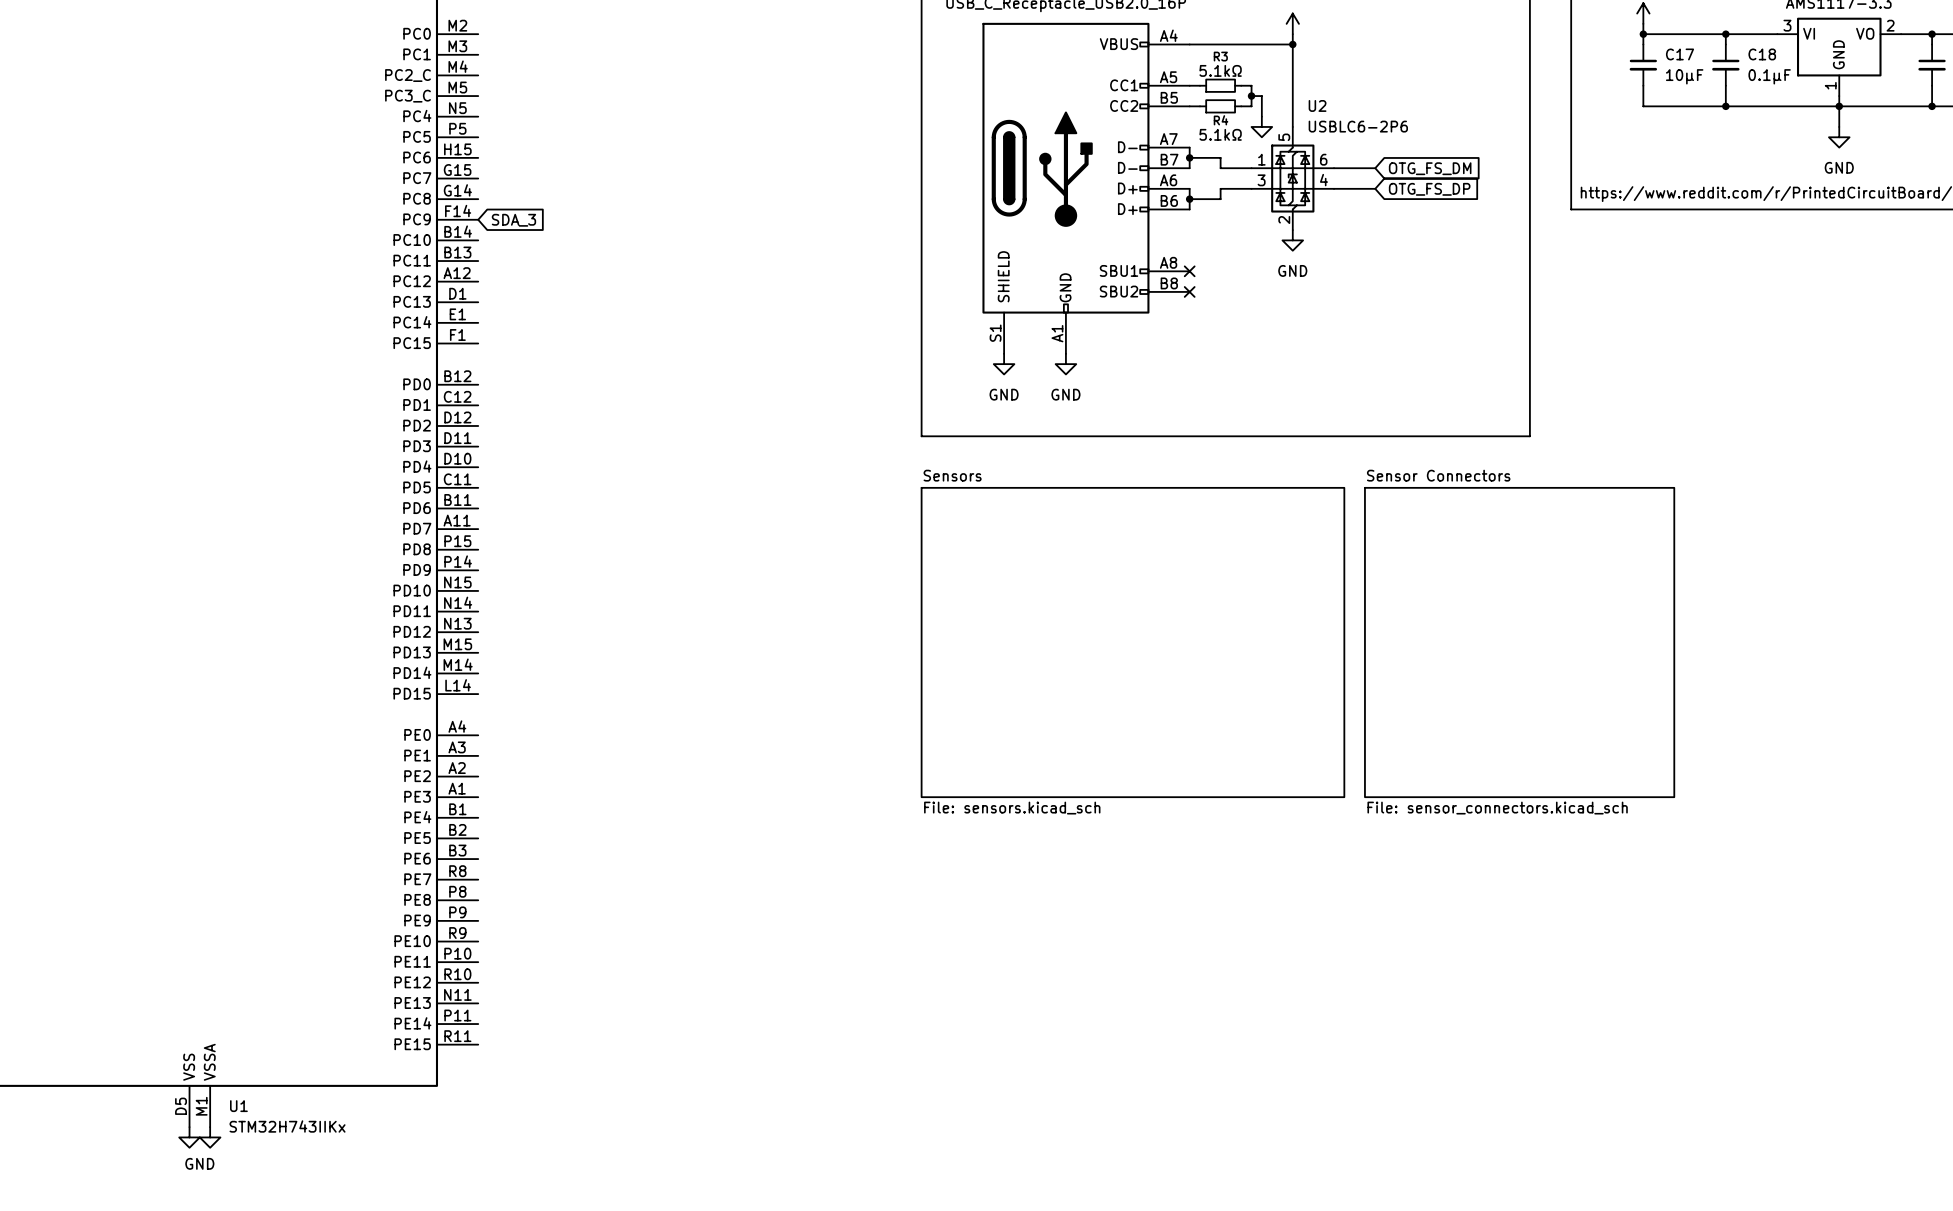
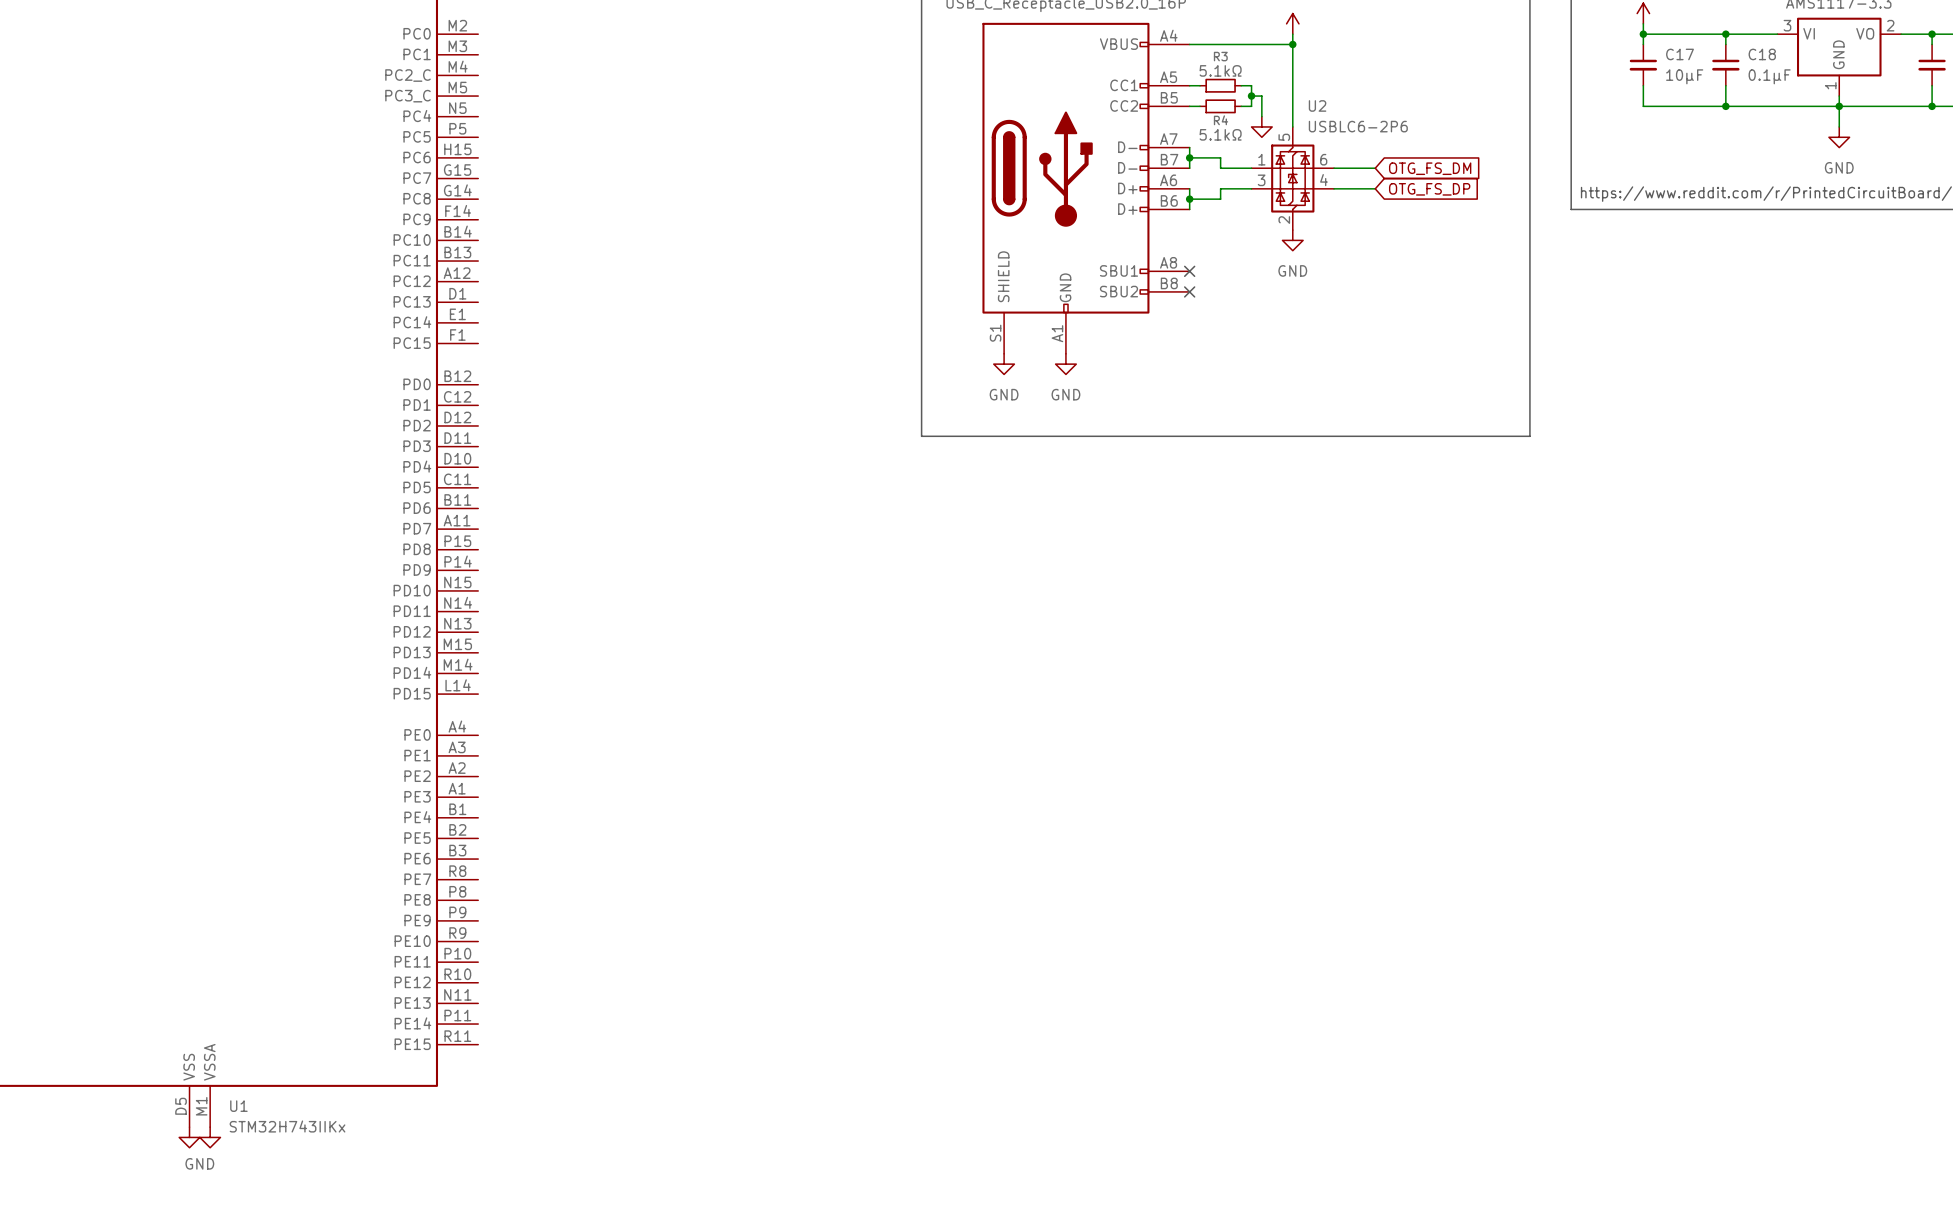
global label: SDA_3 (513, 220) -> none
sheet Sensors: File: sensors.kicad_sch (1132, 642) -> none
sheet Sensor Connectors: File: sensor_connectors.kicad_sch (1519, 642) -> none

